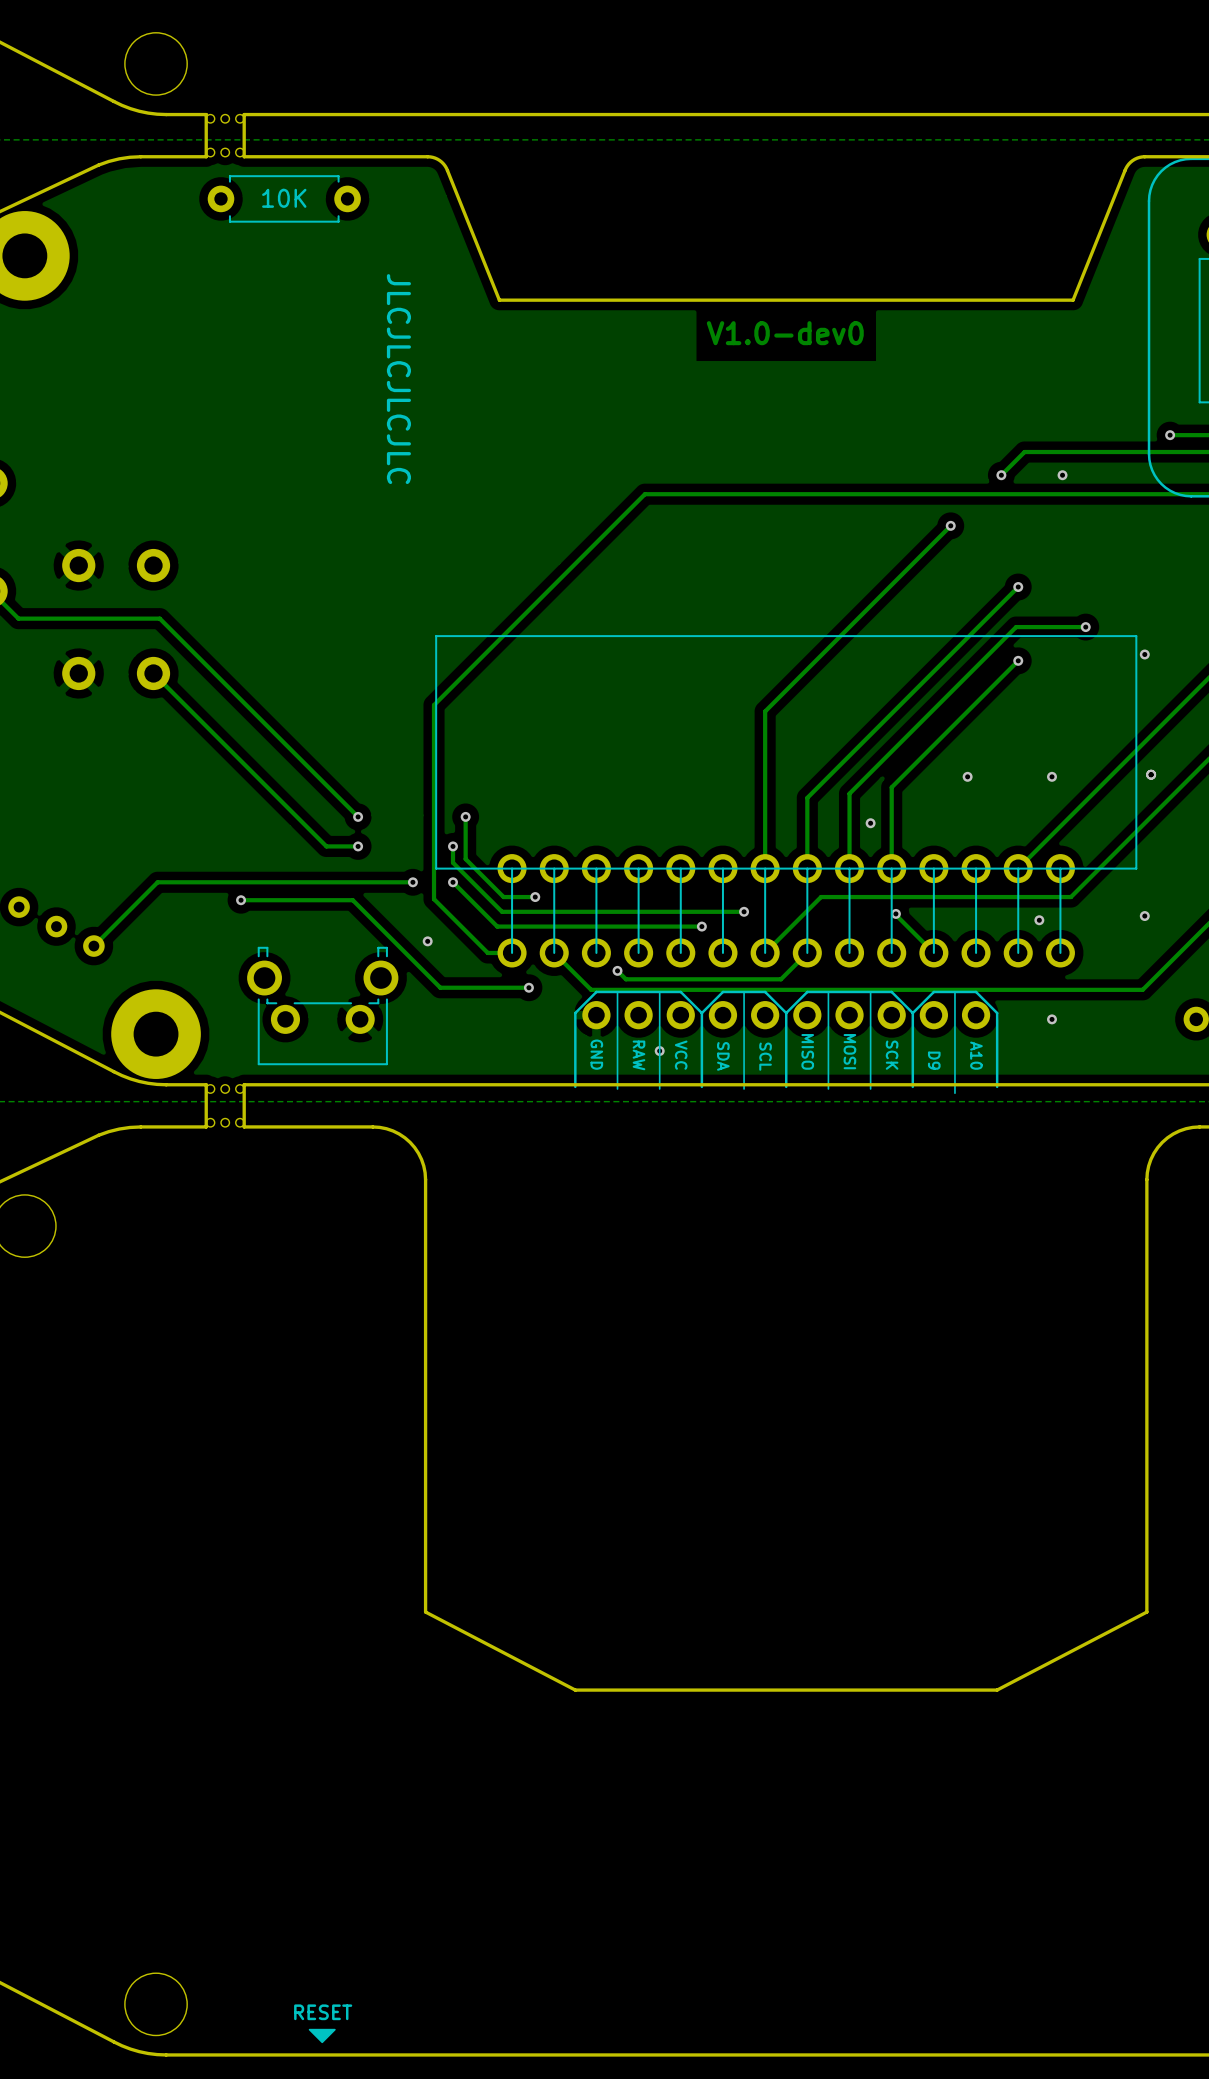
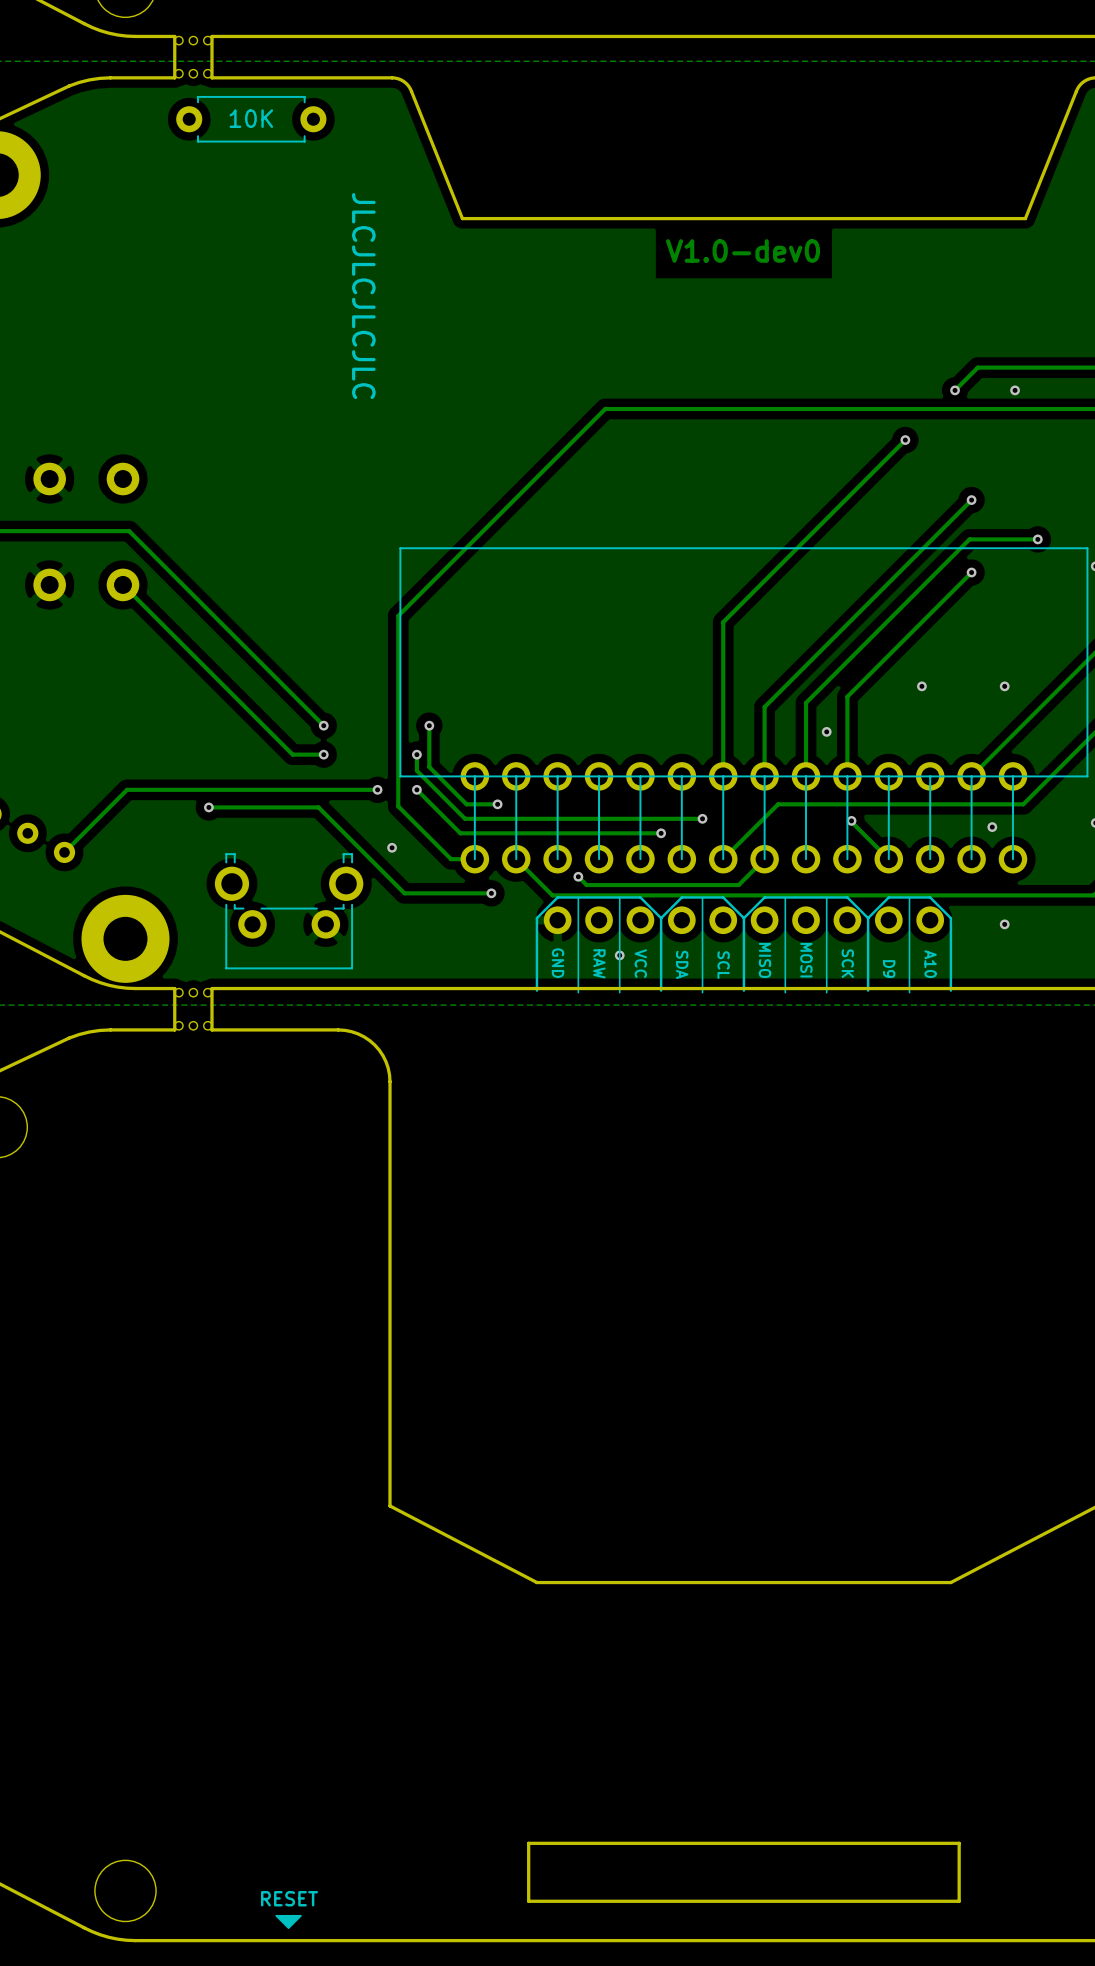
part footprint: [574, 990, 999, 1095] -> [535, 896, 953, 994]
drawing: none -> [527, 1841, 961, 1903]

